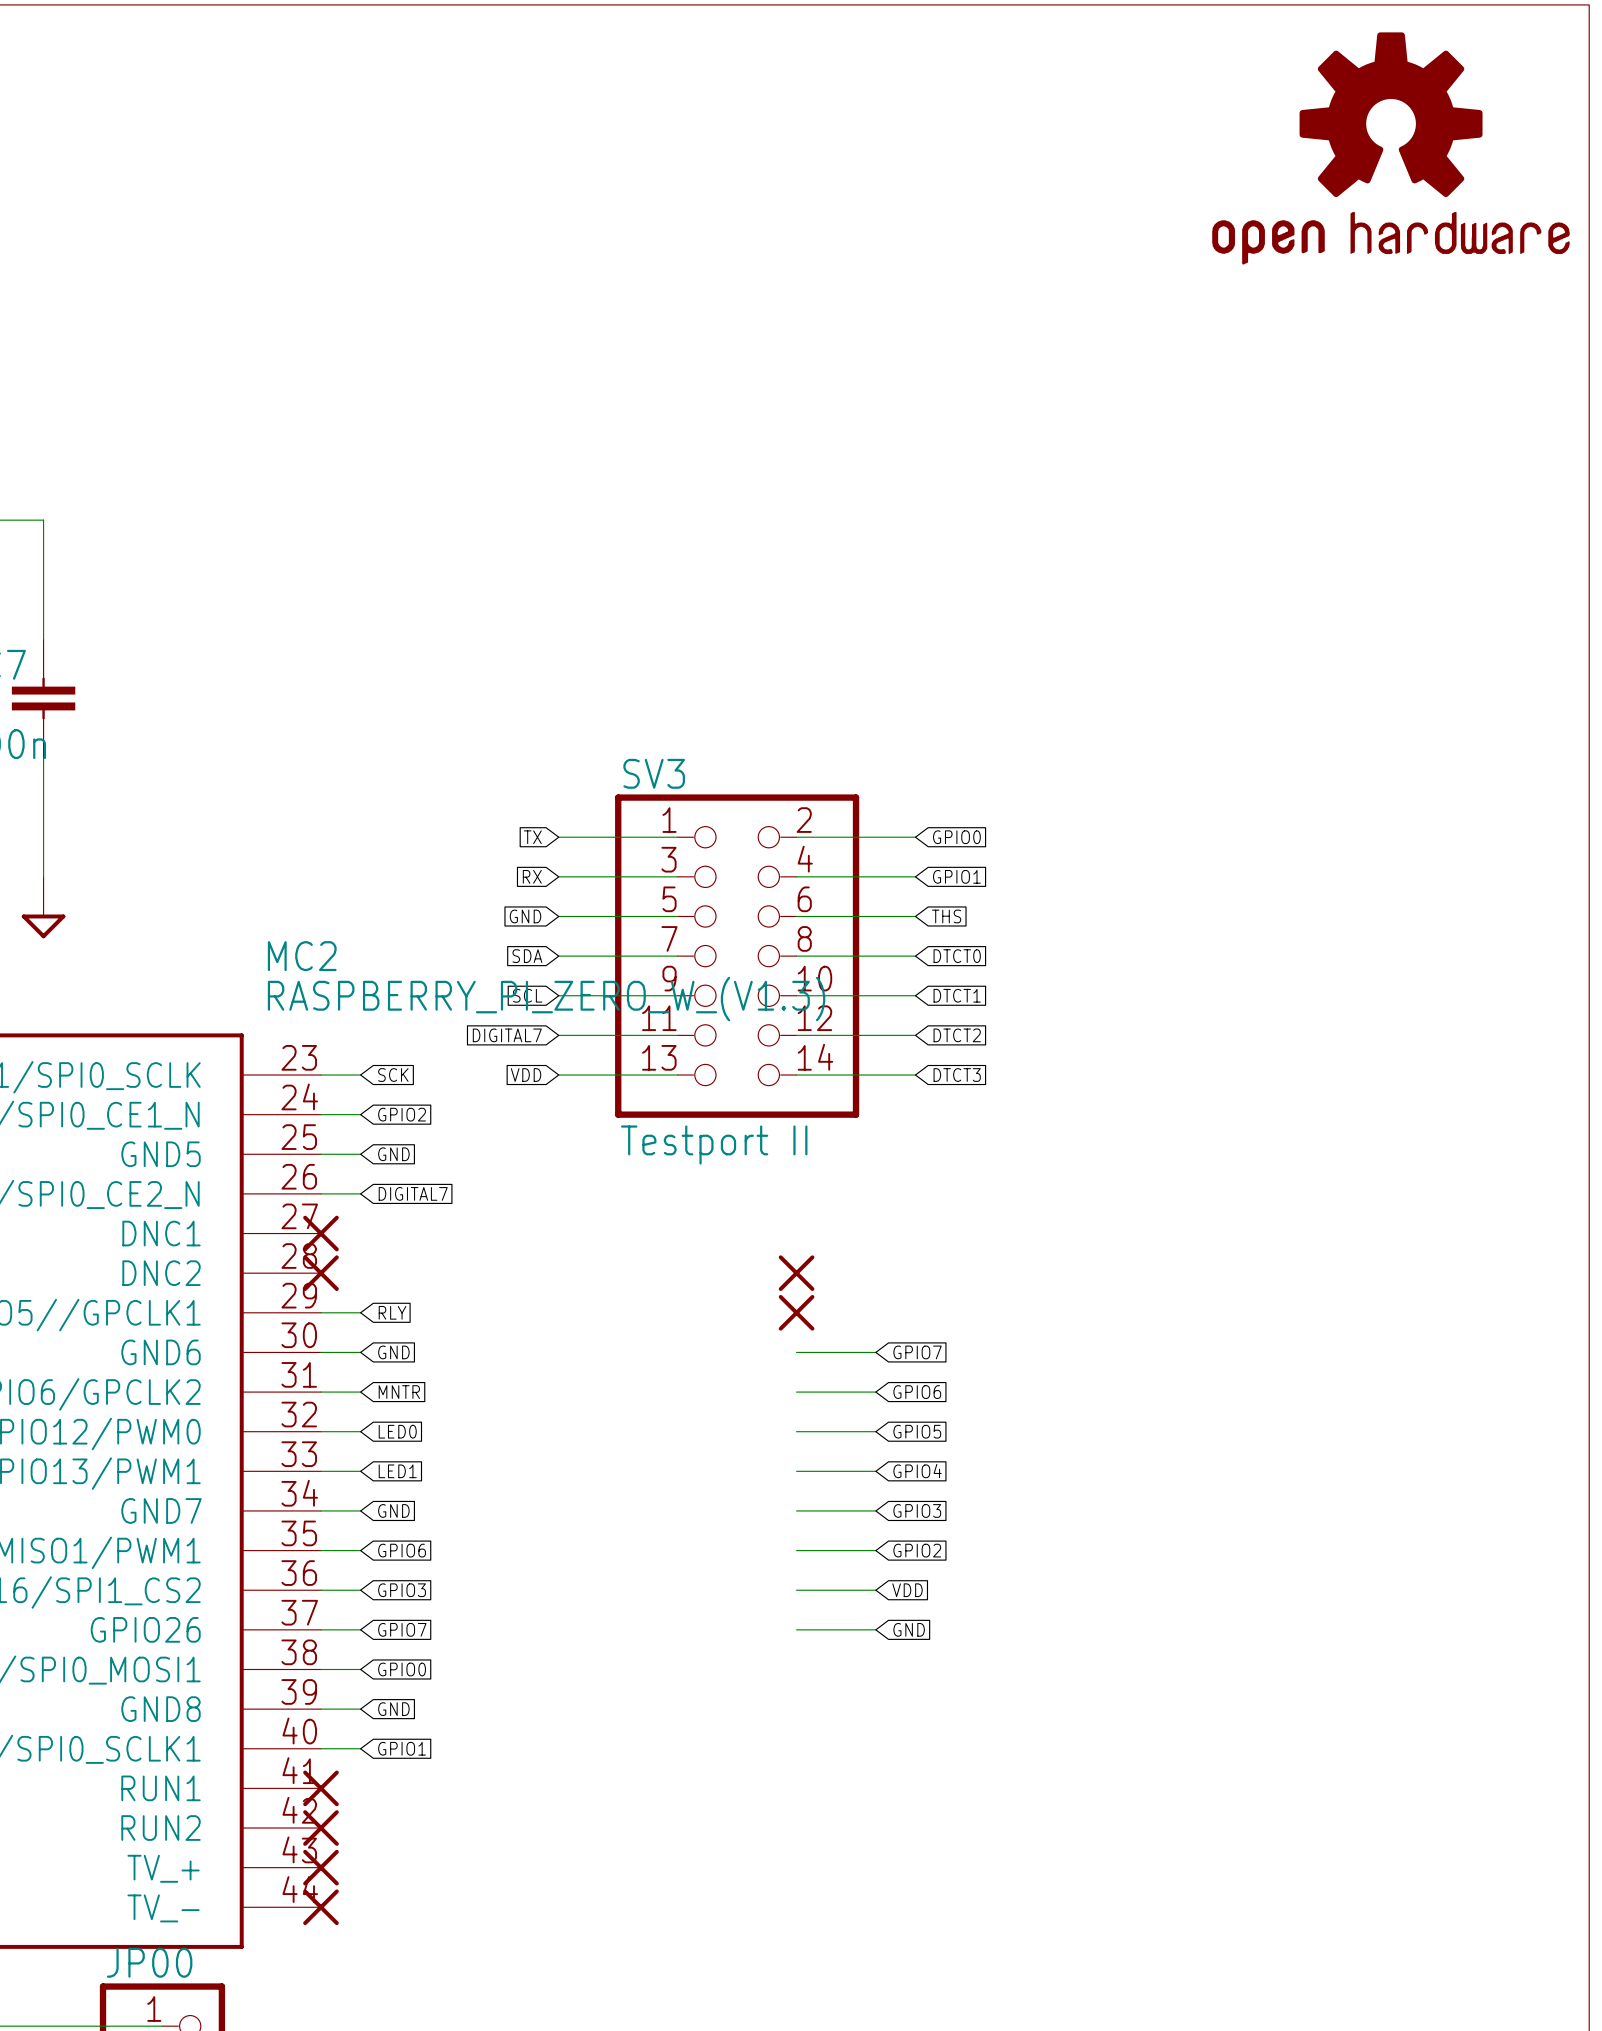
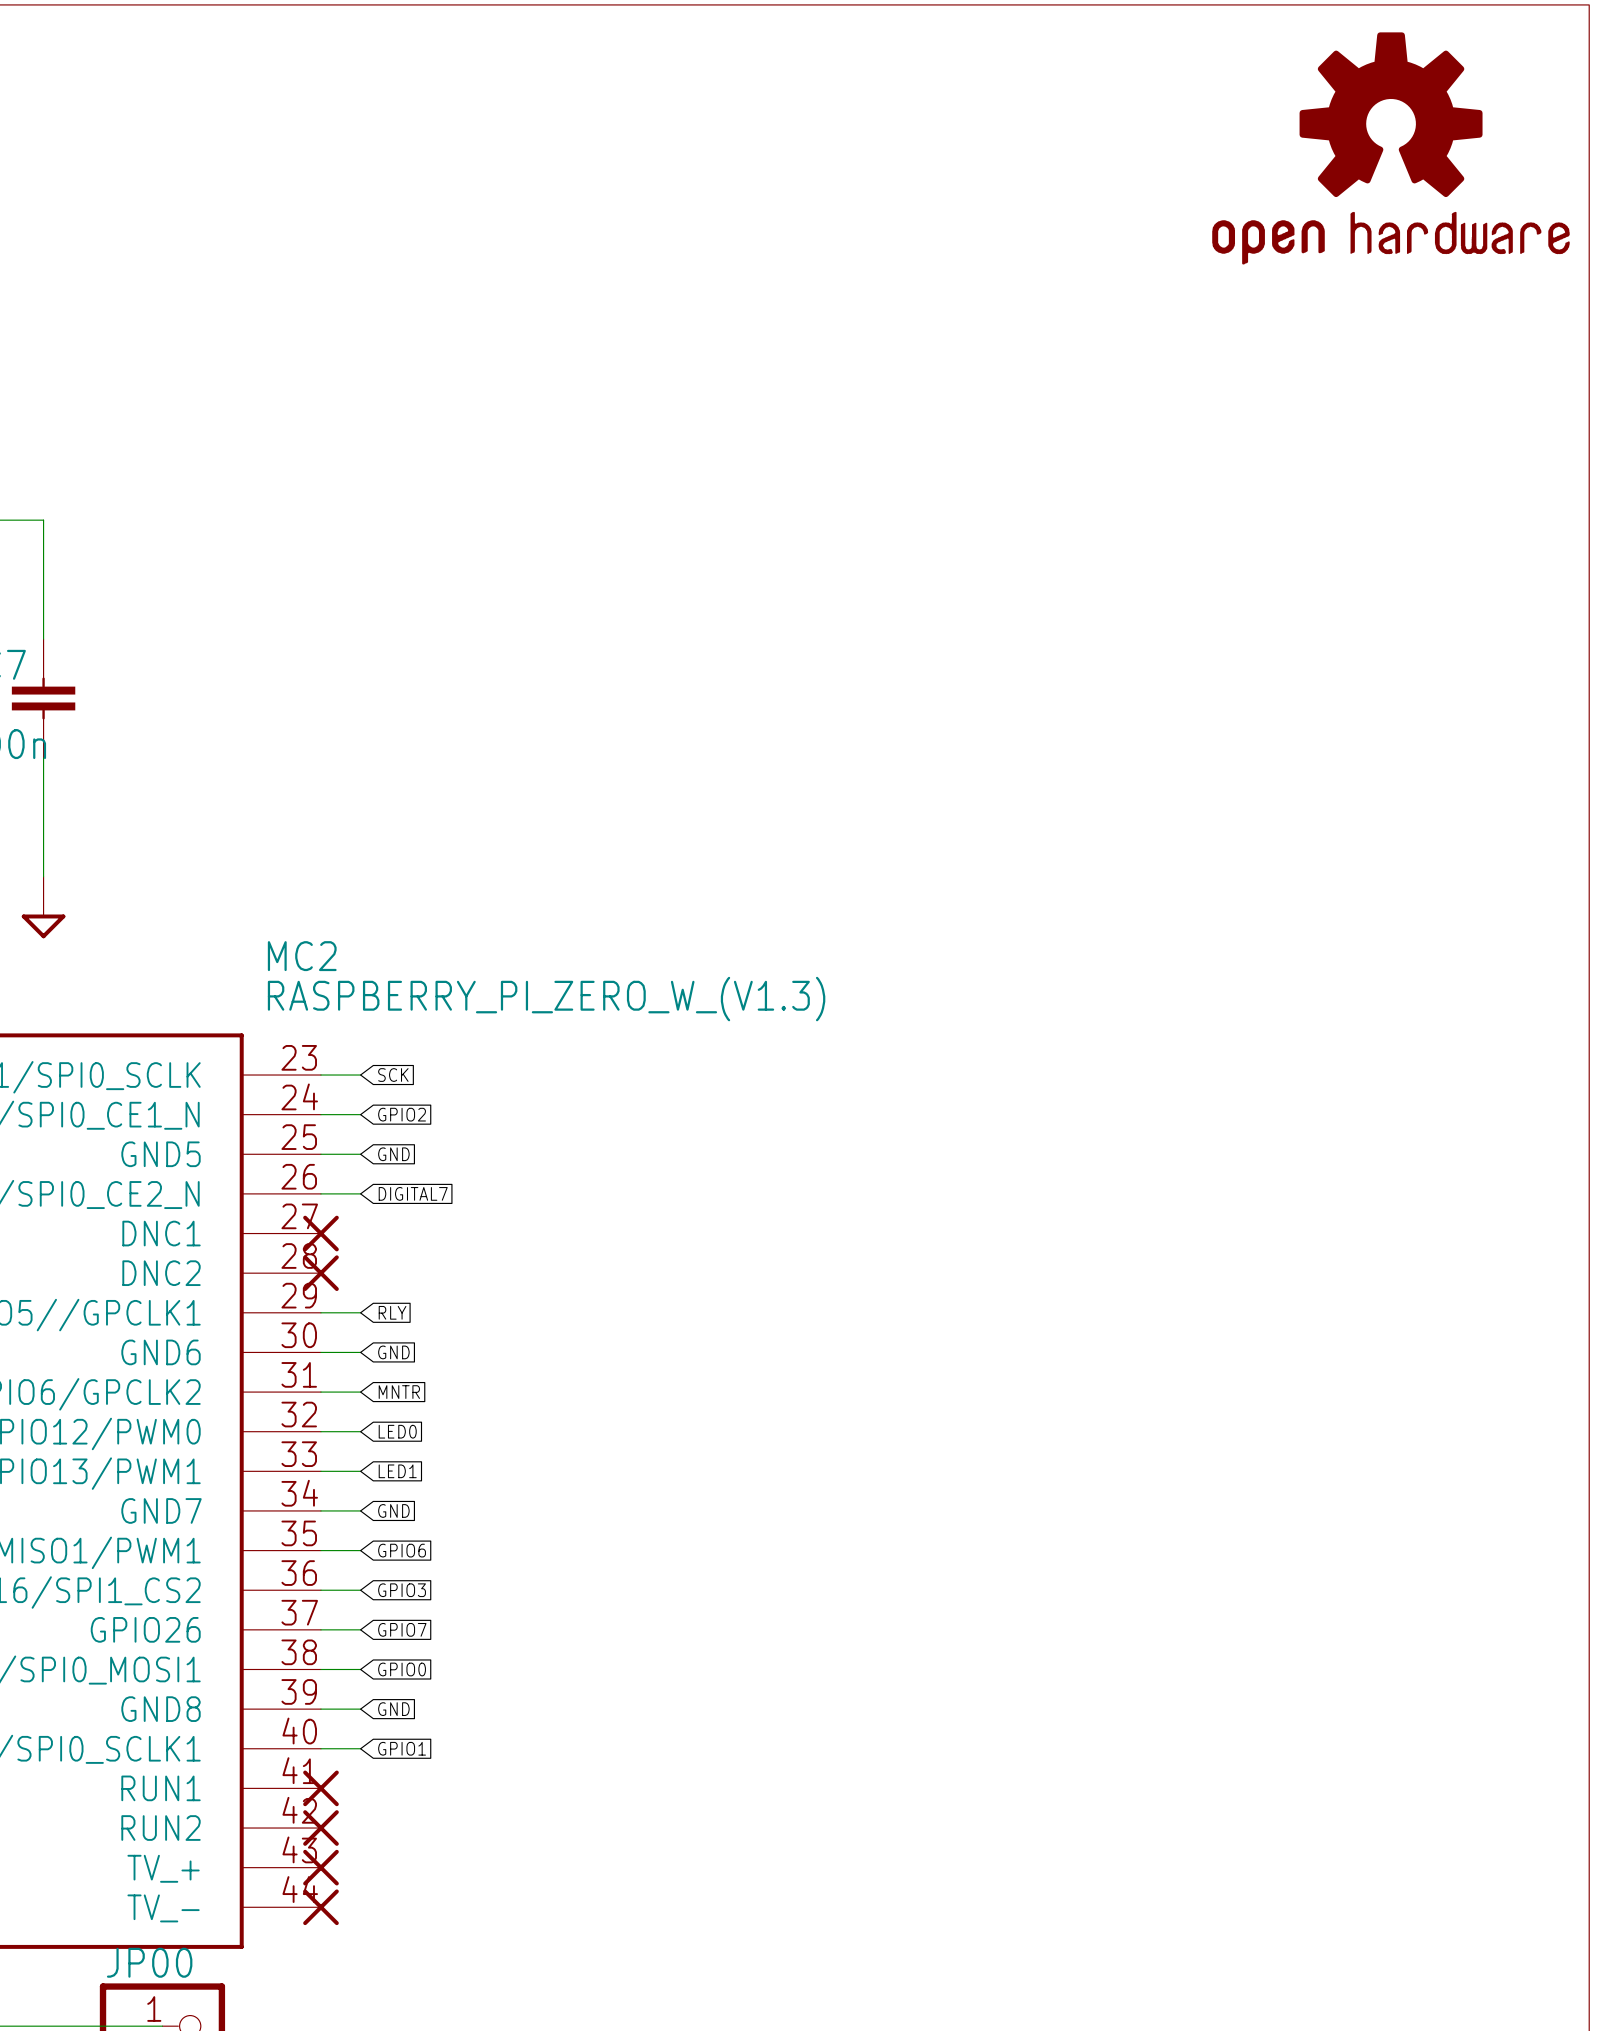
global label: TX (532, 837) -> none
wire: (558, 837) (677, 837) -> none
wire: (796, 837) (915, 837) -> none
global label: GPIO0 (956, 837) -> none
global label: RX (532, 876) -> none
wire: (558, 876) (677, 876) -> none
wire: (796, 876) (915, 876) -> none
global label: GPIO1 (956, 876) -> none
global label: GND (525, 916) -> none
wire: (558, 916) (677, 916) -> none
wire: (796, 916) (915, 916) -> none
global label: THS (946, 916) -> none
global label: SDA (527, 956) -> none
wire: (558, 956) (677, 956) -> none
SV3: Testport II (737, 956) -> none
wire: (796, 956) (915, 956) -> none
global label: DTCT0 (957, 956) -> none
global label: SCL (527, 995) -> none
wire: (558, 995) (677, 995) -> none
wire: (796, 995) (915, 995) -> none
global label: DTCT1 (957, 995) -> none
global label: DIGITAL7 (507, 1035) -> none
wire: (558, 1035) (677, 1035) -> none
wire: (796, 1035) (915, 1035) -> none
global label: DTCT2 (957, 1035) -> none
global label: VDD (526, 1075) -> none
wire: (558, 1075) (677, 1075) -> none
wire: (796, 1075) (915, 1075) -> none
global label: DTCT3 (957, 1075) -> none
part: (796, 1273) -> none
part: (796, 1312) -> none
wire: (796, 1352) (875, 1352) -> none
global label: GPIO7 (917, 1352) -> none
wire: (796, 1392) (875, 1392) -> none
global label: GPIO6 (917, 1392) -> none
wire: (796, 1431) (875, 1431) -> none
global label: GPIO5 (917, 1431) -> none
wire: (796, 1471) (875, 1471) -> none
global label: GPIO4 (917, 1471) -> none
wire: (796, 1510) (875, 1510) -> none
global label: GPIO3 (917, 1510) -> none
wire: (796, 1550) (875, 1550) -> none
global label: GPIO2 (917, 1550) -> none
wire: (796, 1590) (875, 1590) -> none
global label: VDD (907, 1590) -> none
wire: (796, 1629) (875, 1629) -> none
global label: GND (909, 1629) -> none

